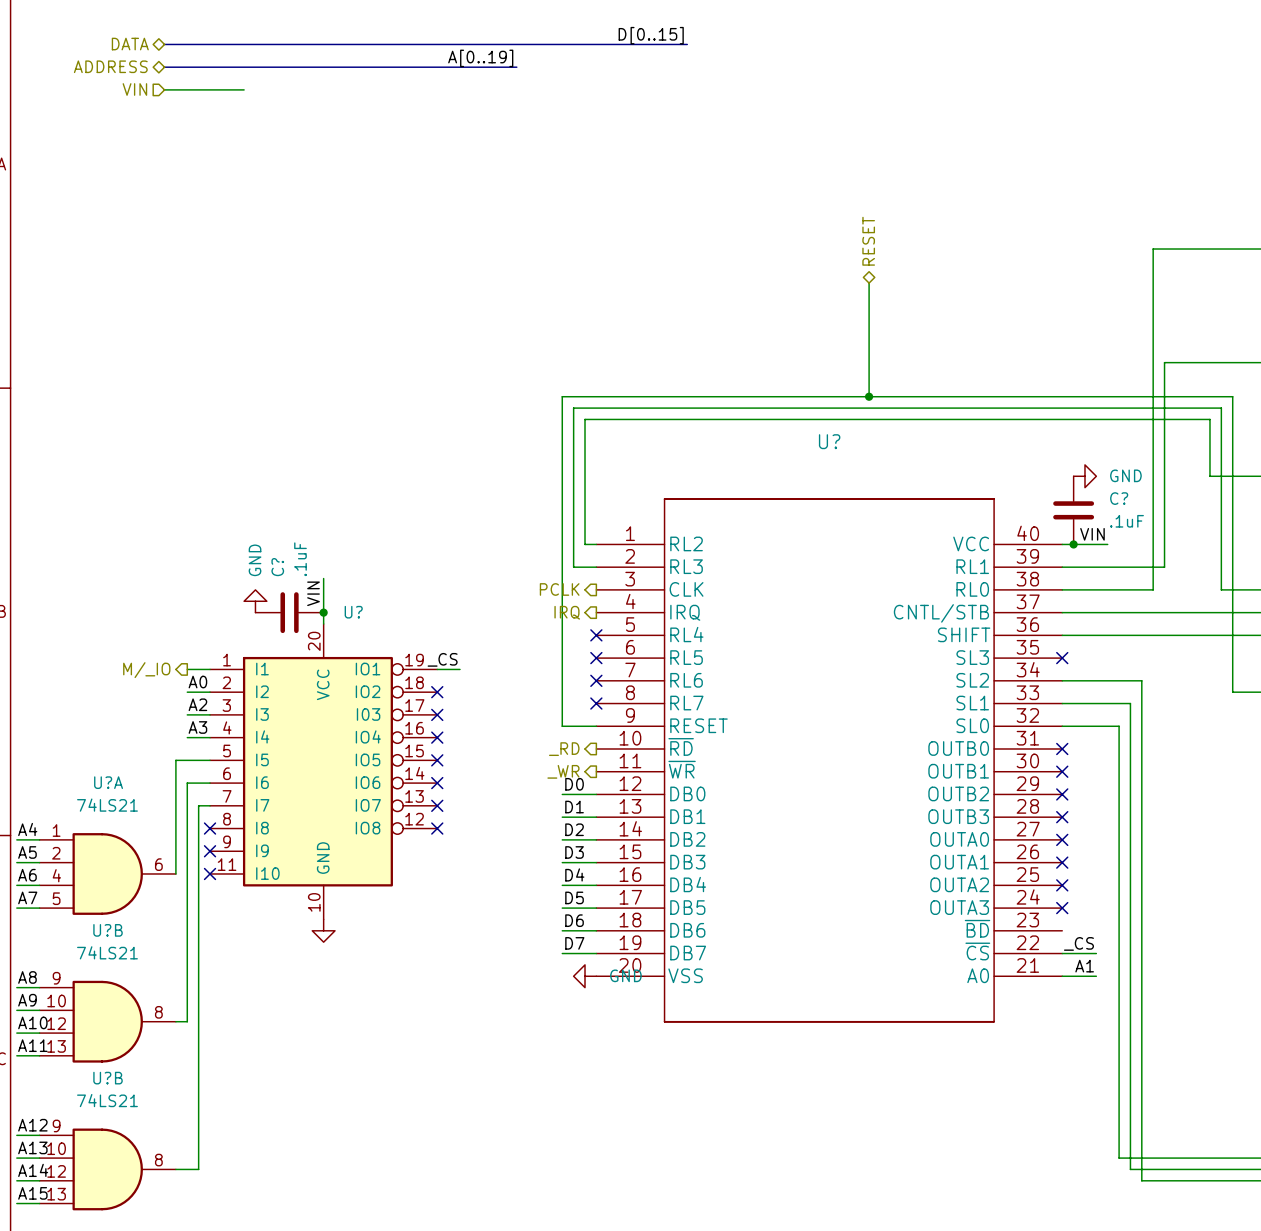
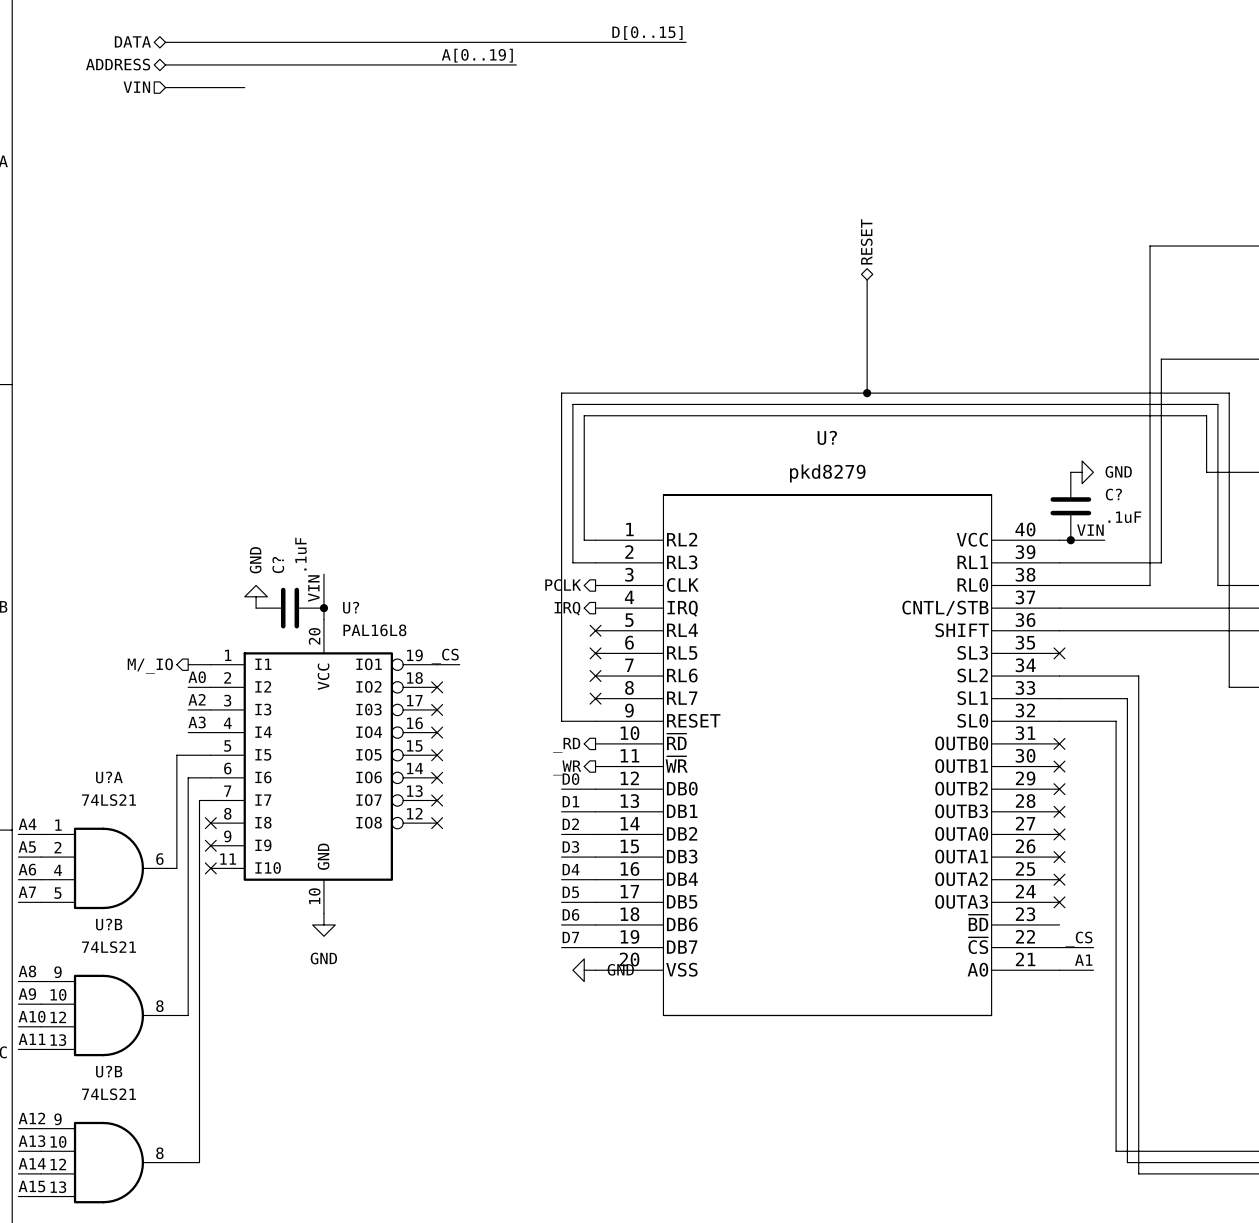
U? value: none -> pkd8279 (827, 473)
U? value: none -> PAL16L8 (374, 630)
power symbol text: none -> GND (323, 958)

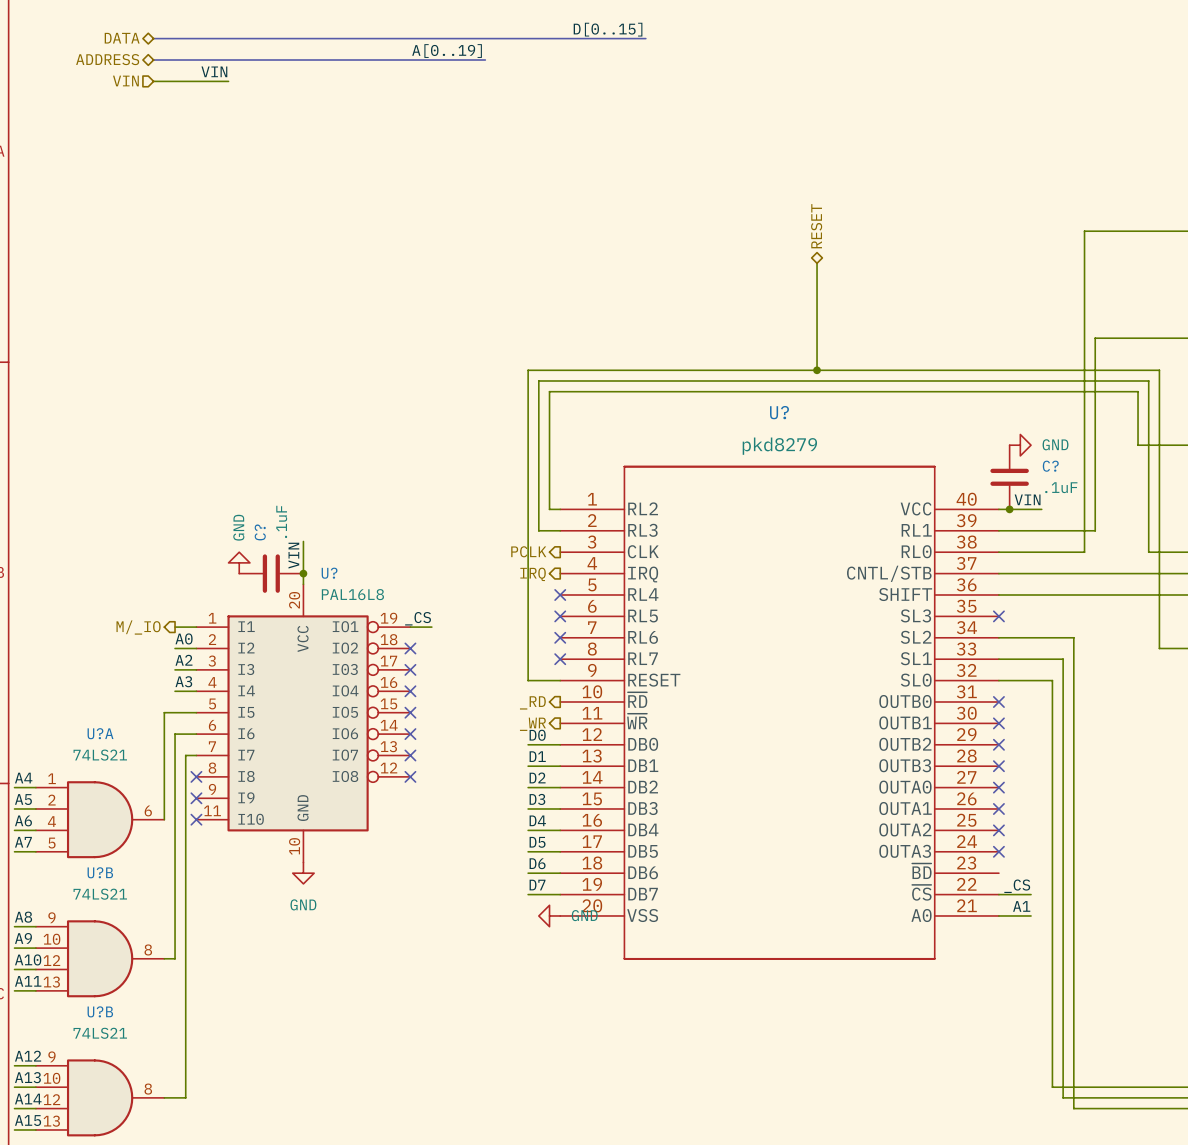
label: none -> VIN (214, 71)

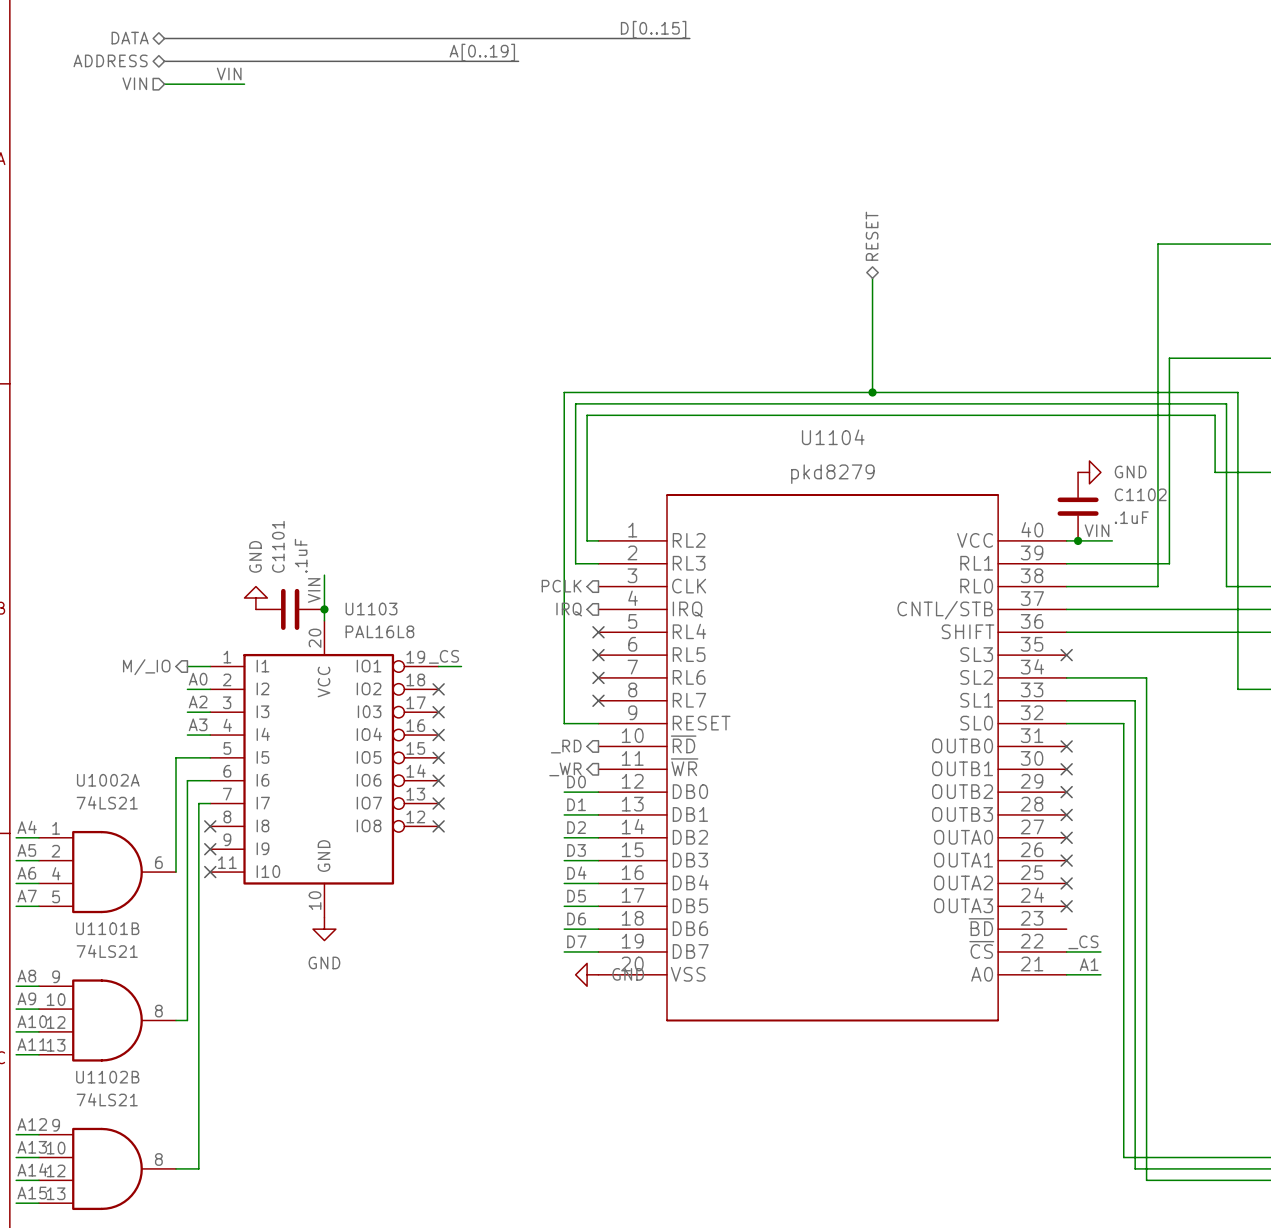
U? name: U? (779, 412) -> U1104 (833, 437)
C? name: C? (1050, 466) -> C1102 (1140, 494)
C? name: C? (260, 532) -> C1101 (278, 546)
U? name: U? (329, 573) -> U1103 (371, 609)
U?A name: U?A (100, 733) -> U1002A (108, 780)
U?B name: U?B (100, 872) -> U1101B (107, 928)
U?B name: U?B (100, 1011) -> U1102B (107, 1077)

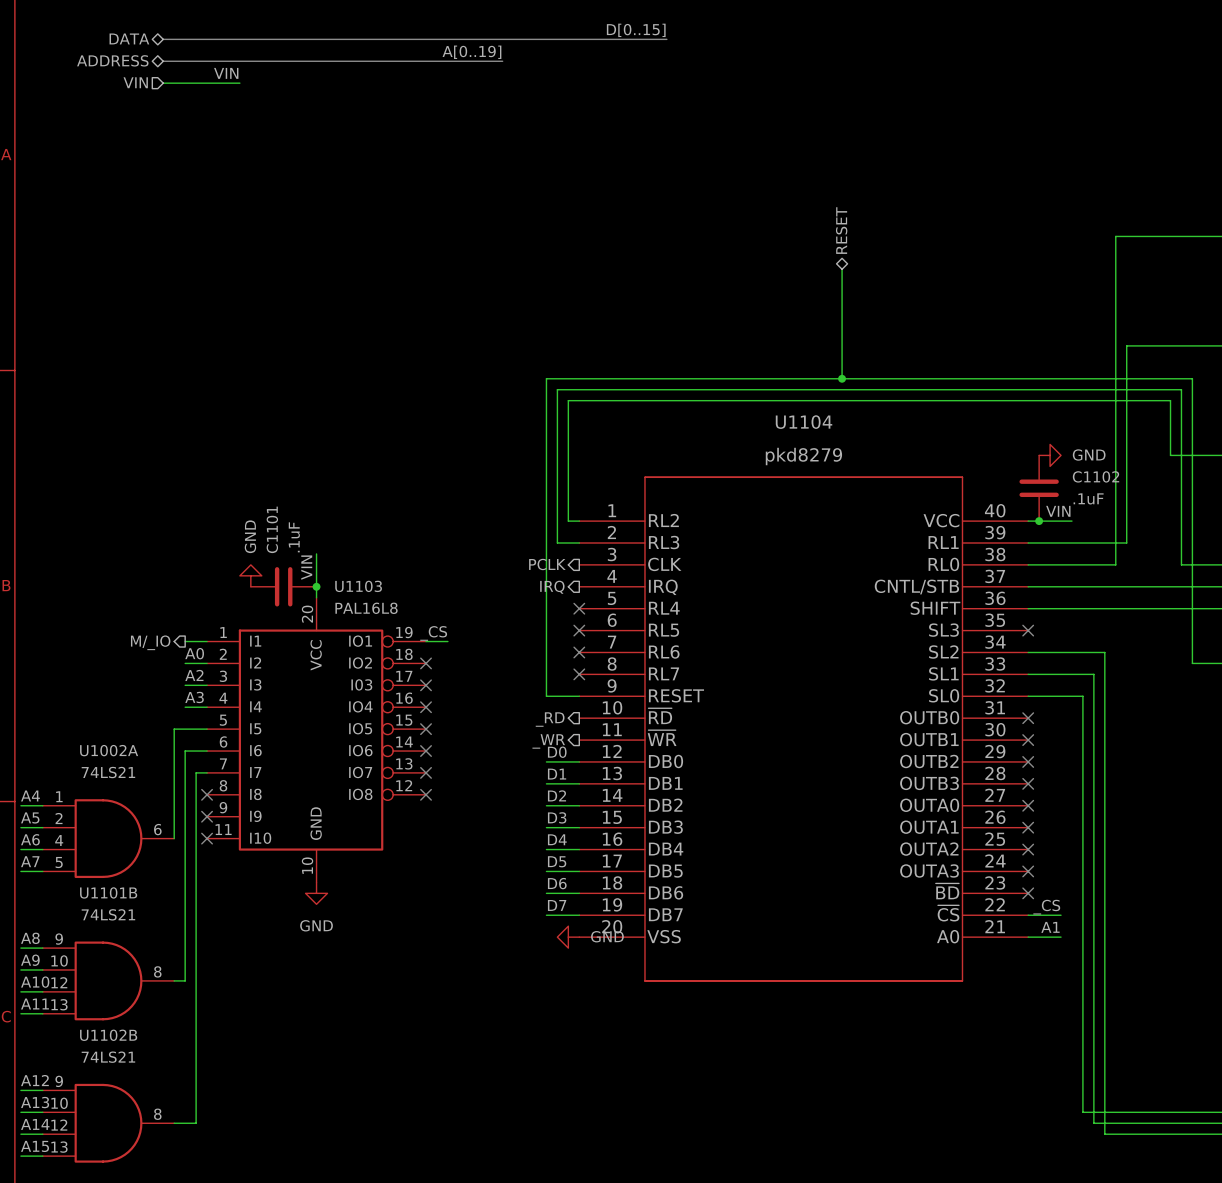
no-connect mark: none -> (1028, 893)

